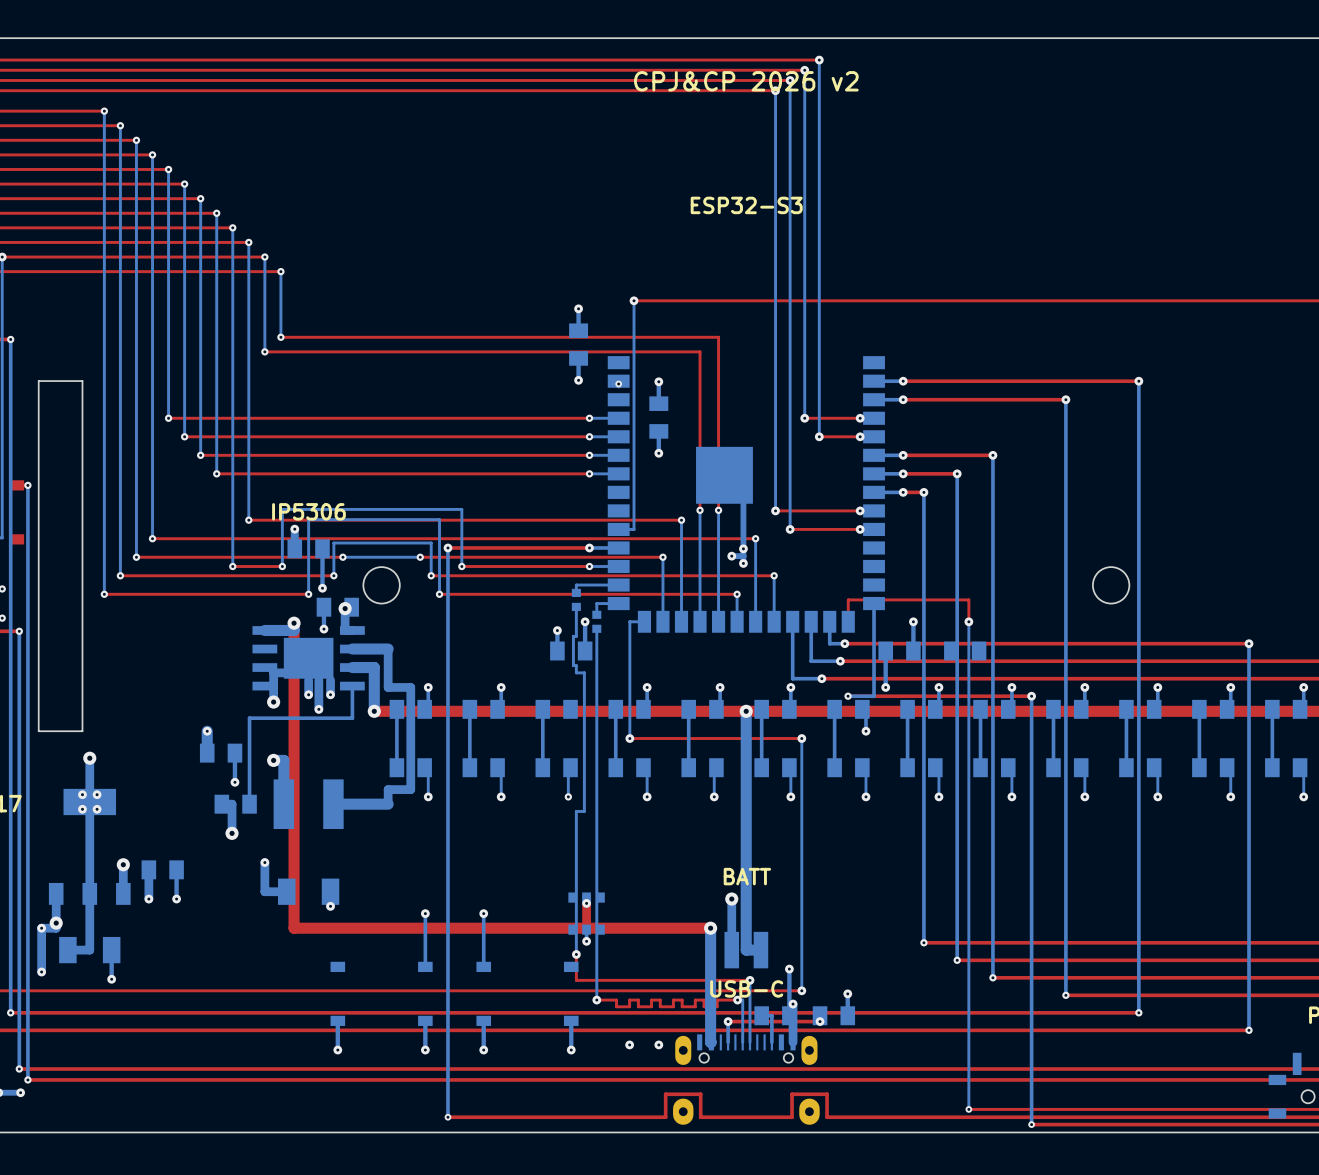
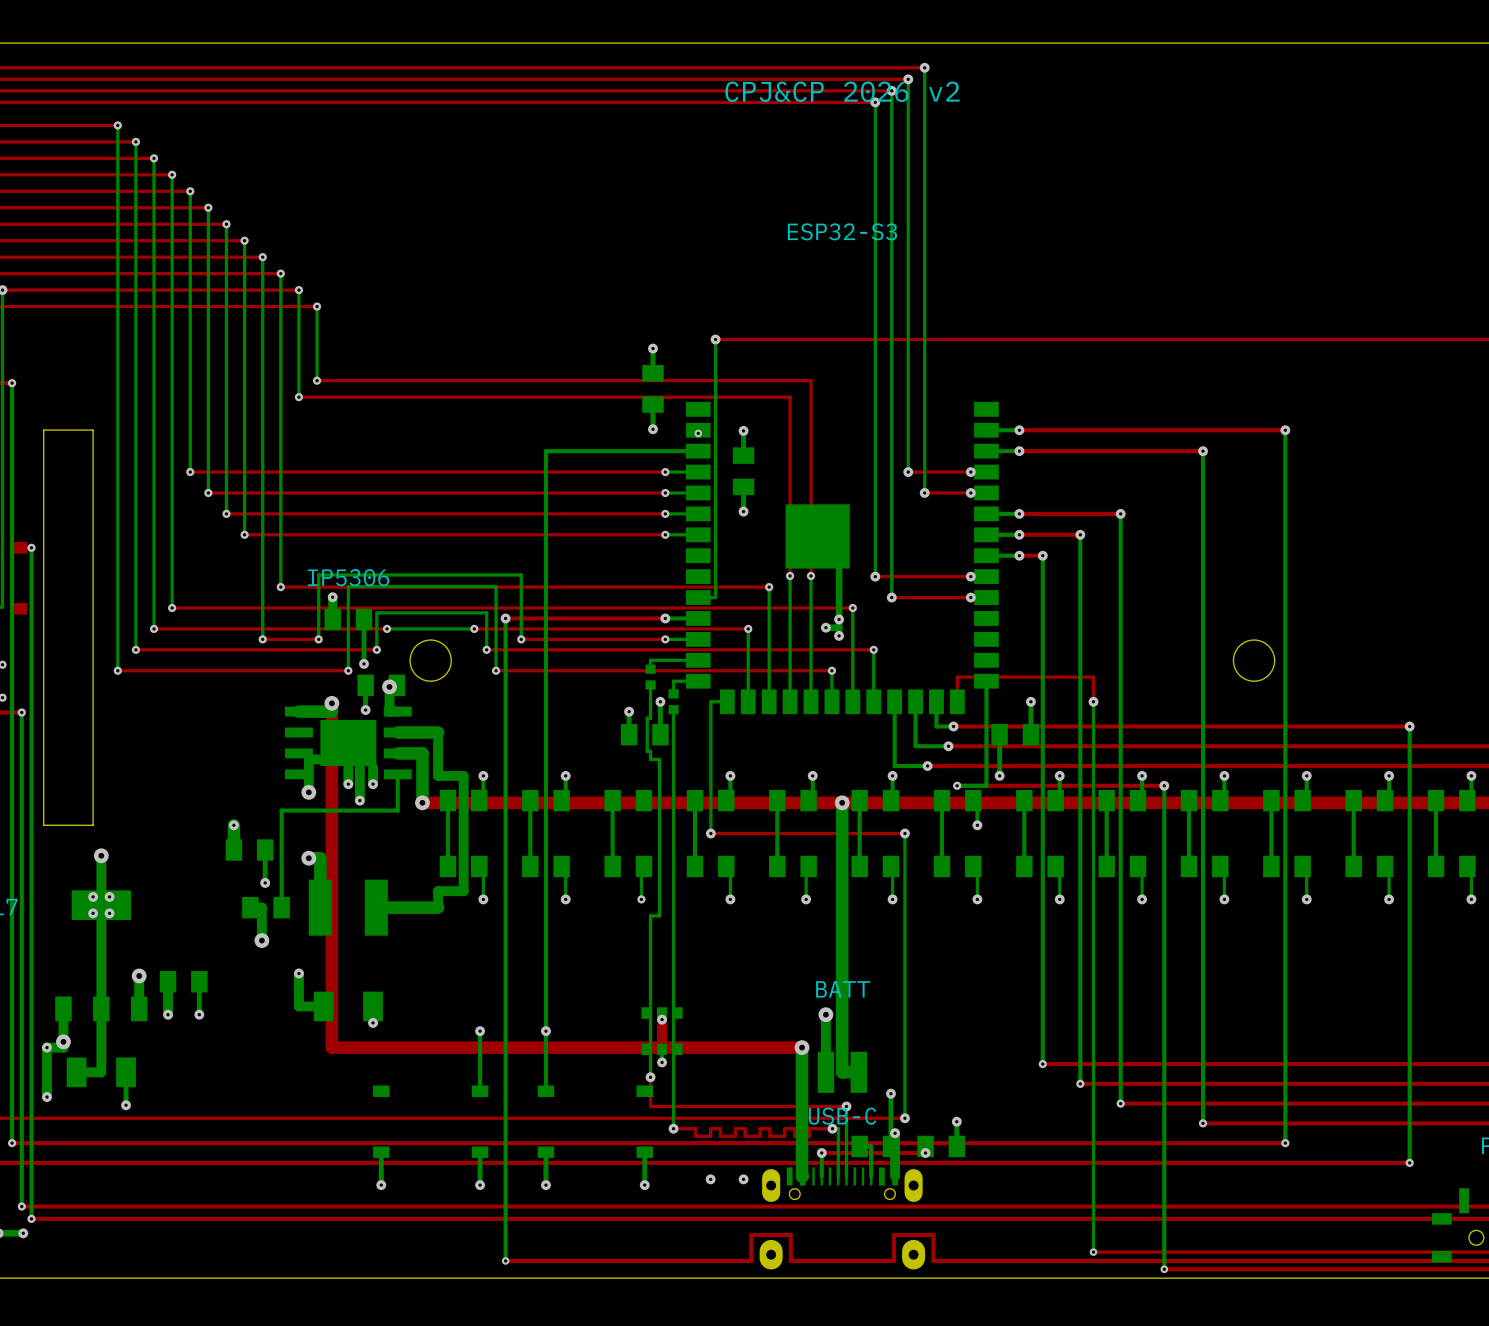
bottom track: none -> (698, 451) (545, 451) (545, 1031)
part: (965, 650) -> none

